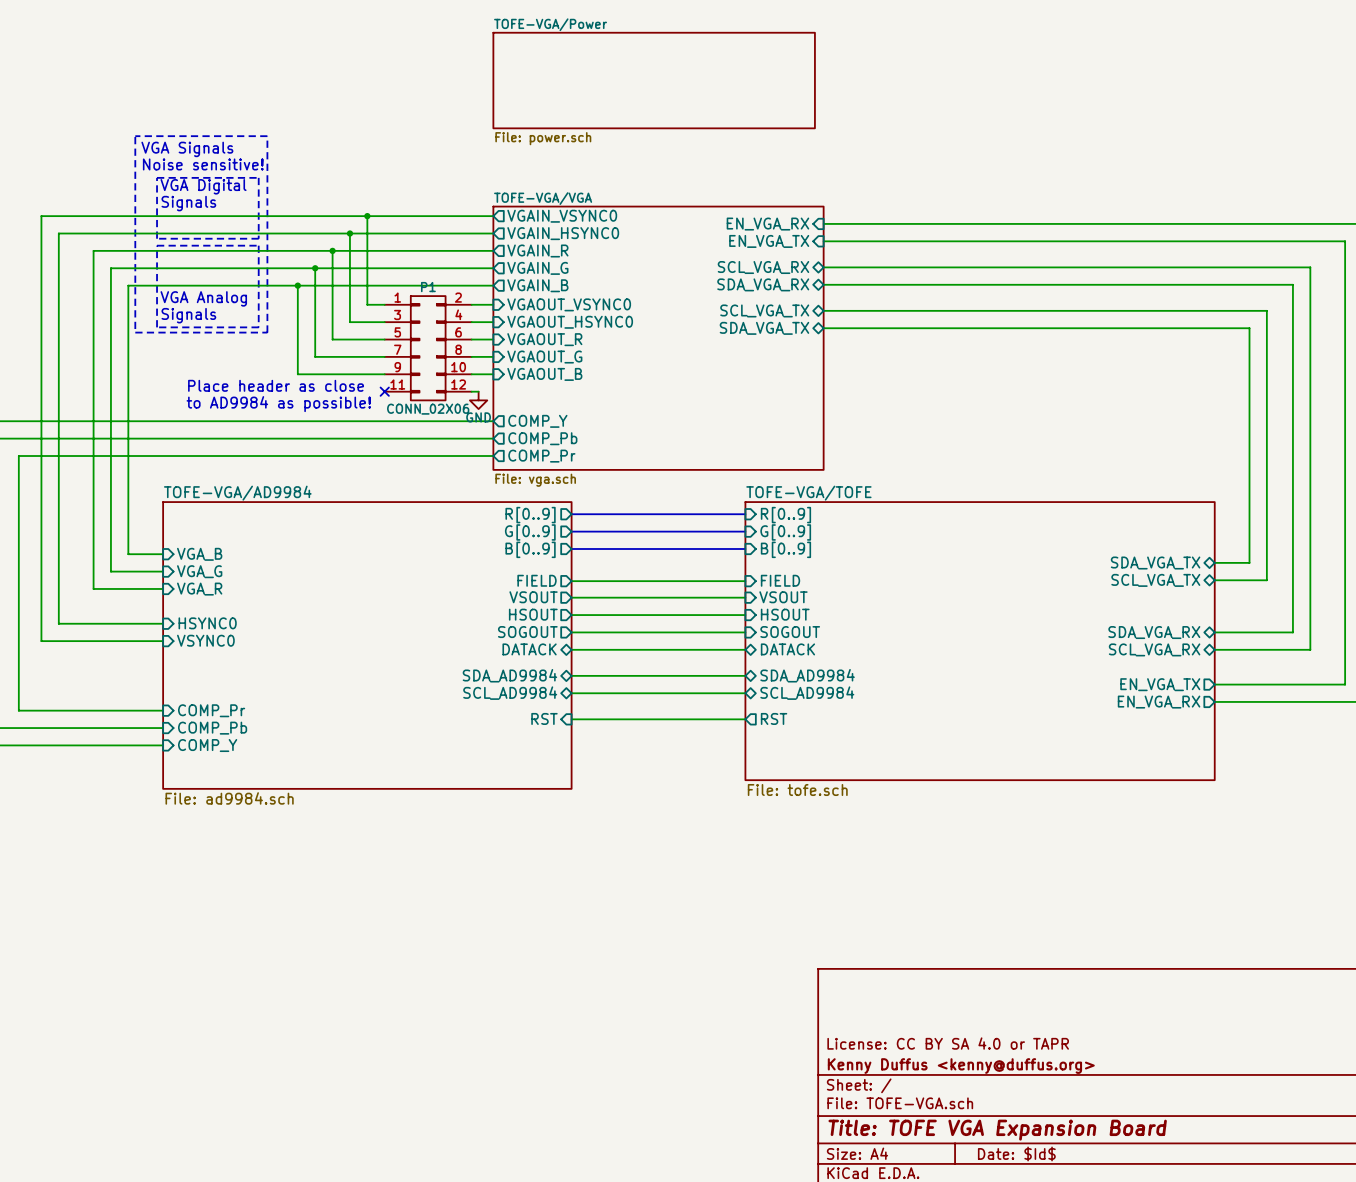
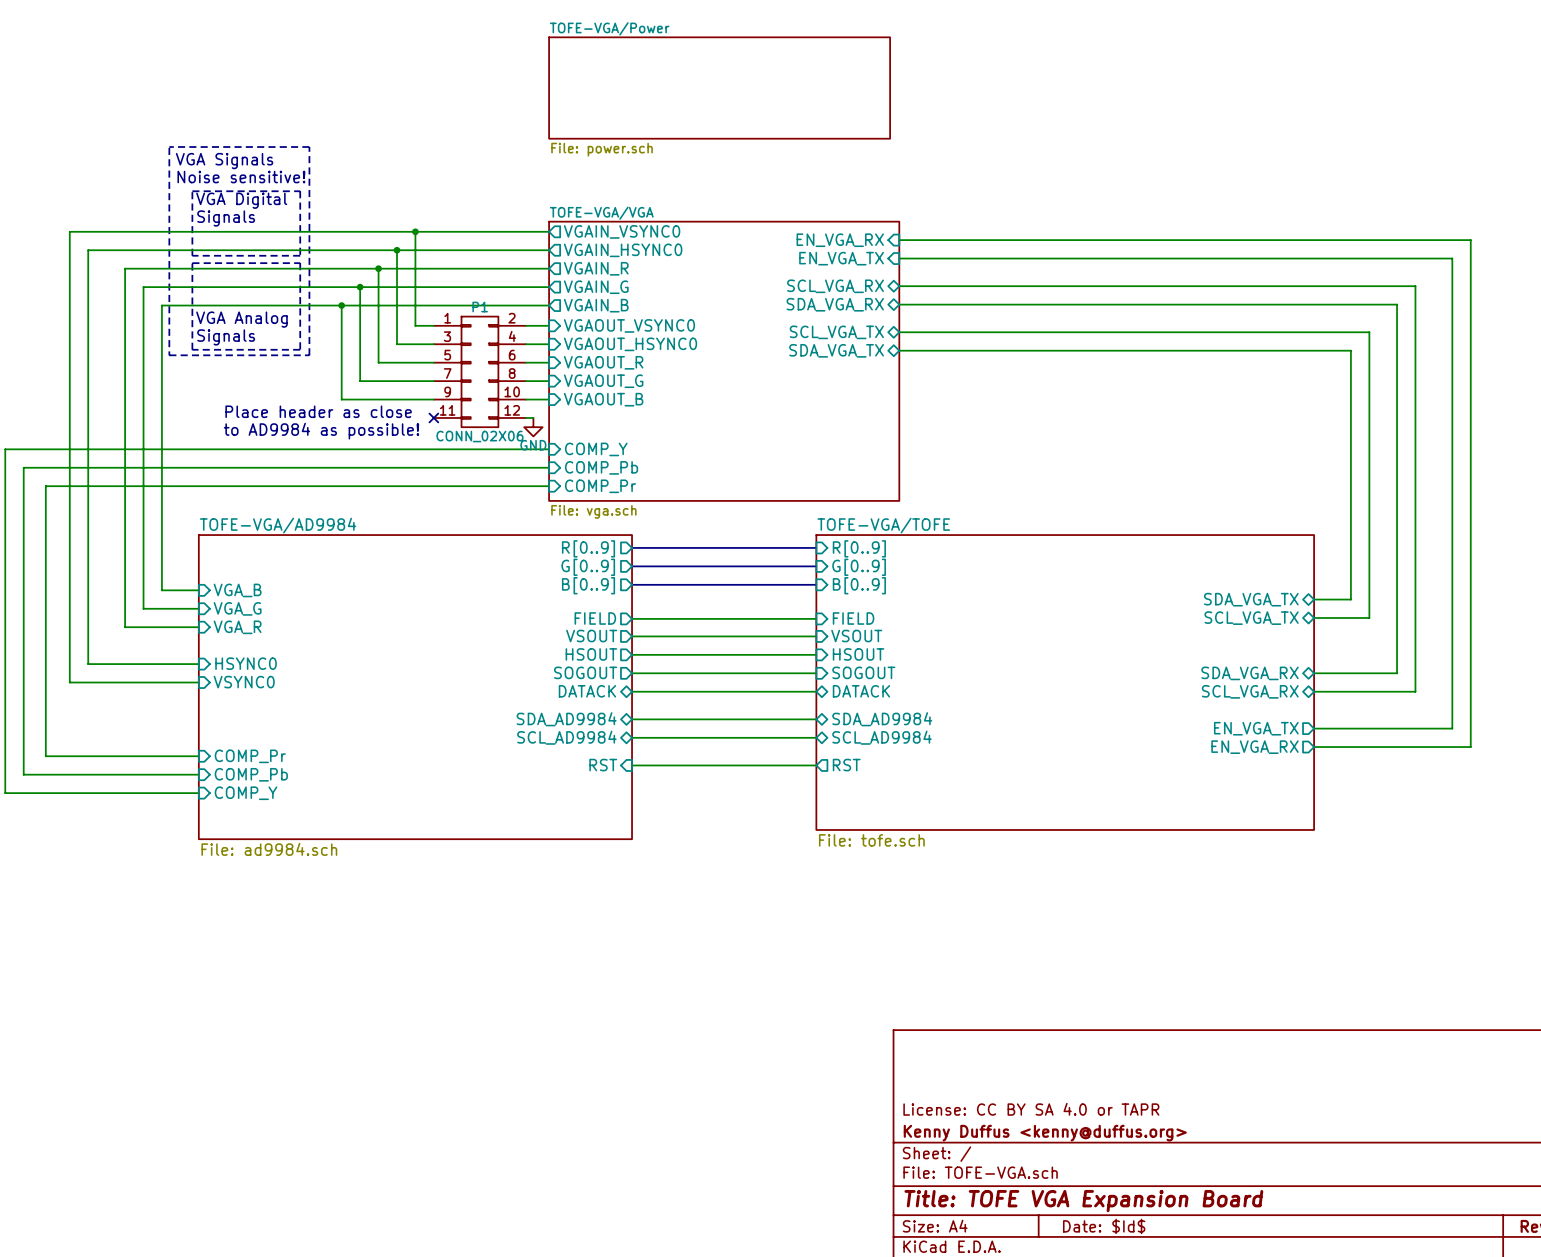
sheet pin shape: output (537, 421) -> input (596, 449)
sheet pin shape: output (542, 438) -> input (601, 467)
sheet pin shape: output (541, 456) -> input (600, 486)

